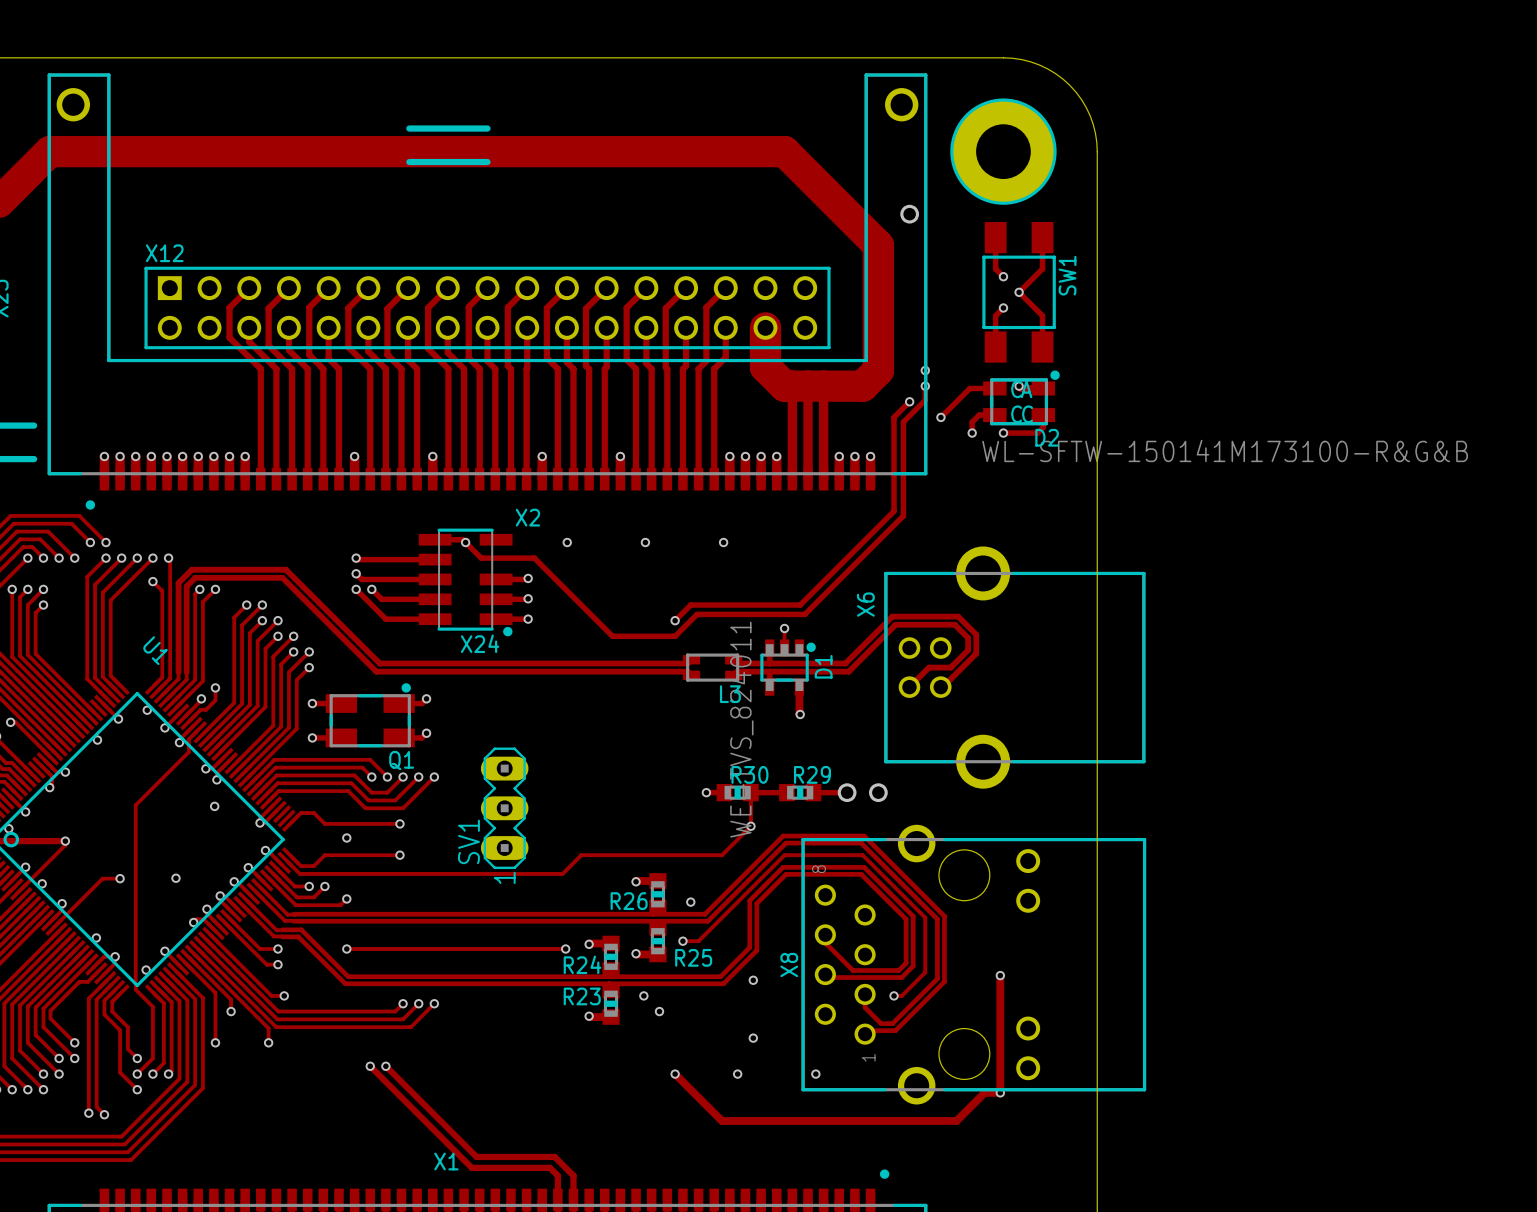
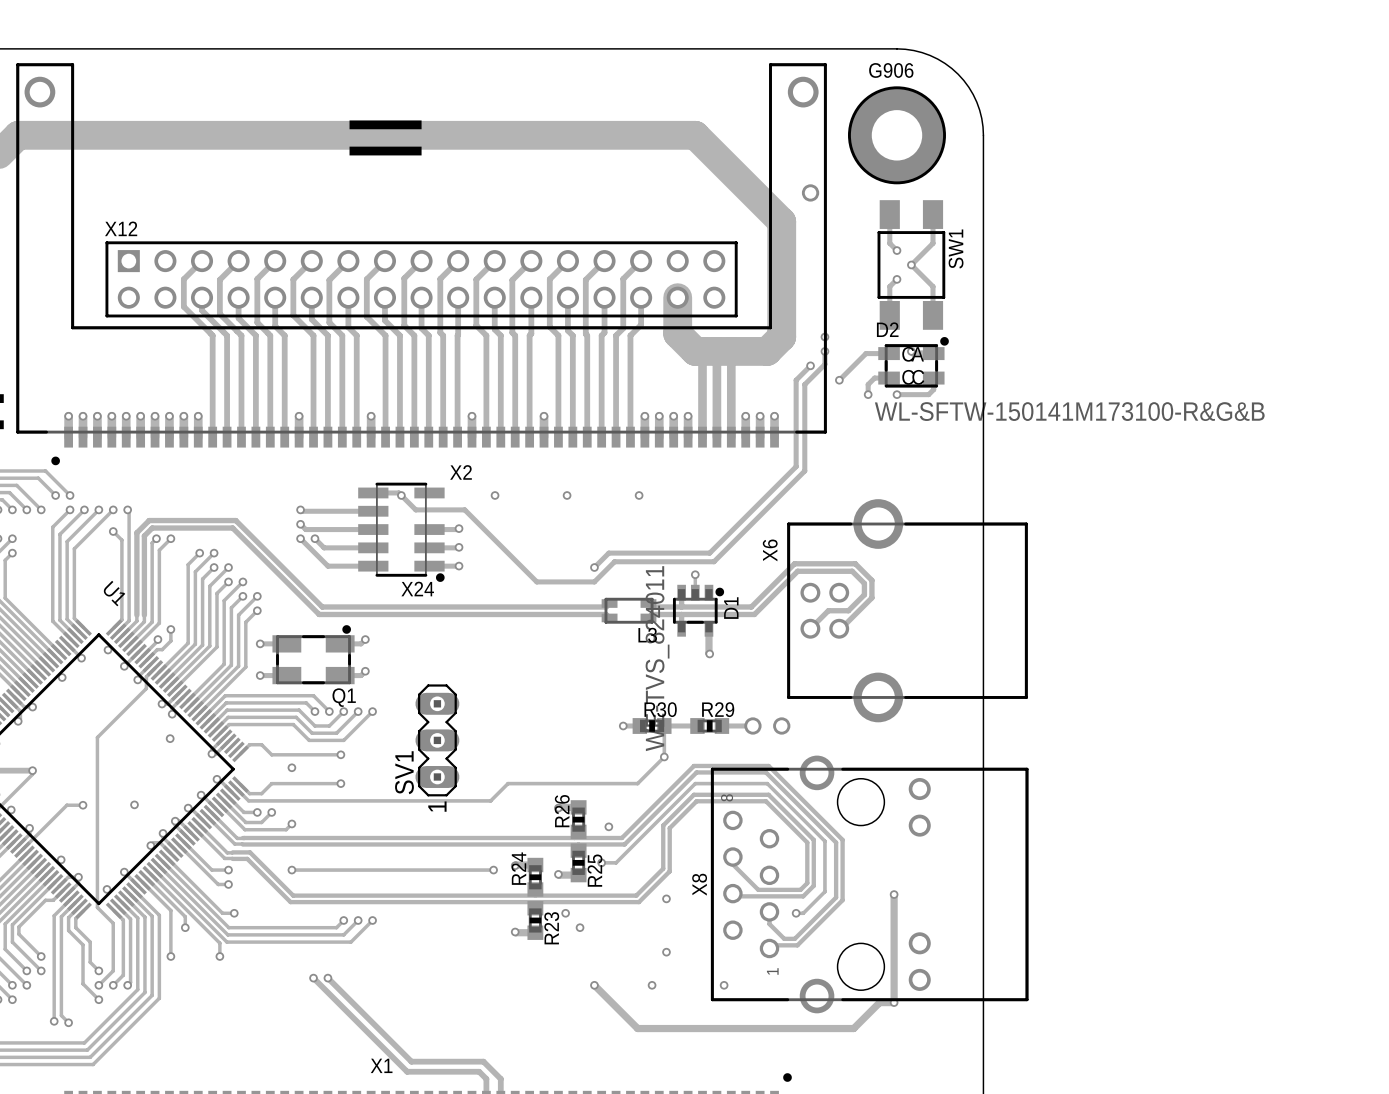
G906 name: none -> G906 (891, 70)
D2 name position: D2 (1047, 437) -> D2 (887, 329)
R26 name rotation: 0° (629, 901) -> 90° counterclockwise (562, 811)
R25 name rotation: 0° (693, 957) -> 90° counterclockwise (594, 870)
R24 name rotation: 0° (582, 964) -> 90° counterclockwise (518, 868)
R23 name rotation: 0° (582, 996) -> 90° counterclockwise (551, 928)
R23 name position: R23 (582, 996) -> R23 (551, 928)

